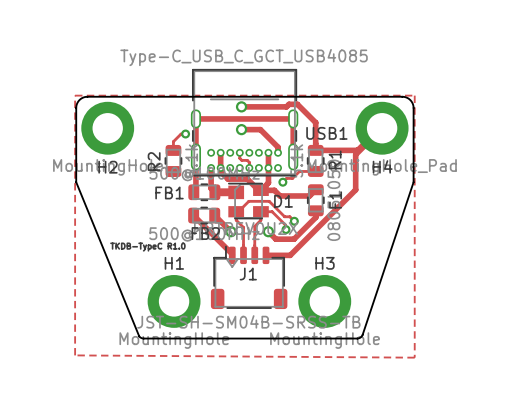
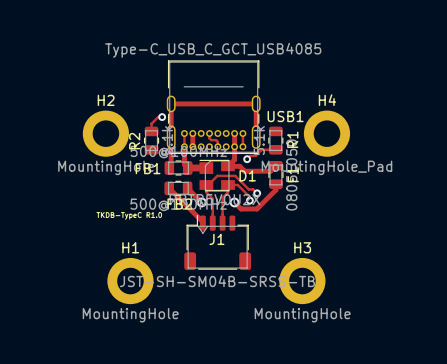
zone outline: (75, 95) (414, 95) (414, 357) (75, 355) (75, 95) -> none
board edge: (87, 96) (402, 96) (409, 99) (413, 108) (413, 182) (361, 336) (357, 338) (140, 337) (76, 182) (76, 106) (80, 99) (87, 96) -> none
track: (241, 106) (286, 106) (289, 104) (297, 104) (315, 122) (315, 150) (357, 150) (379, 128) (382, 128) (355, 154) (355, 189) (290, 255) (266, 255) -> none
via: (241, 106) -> none
H2 position: (107, 128) -> (105, 133)
H4 position: (382, 128) -> (326, 133)
track: (241, 129) (260, 129) (278, 147) (278, 152) -> (242, 146) (242, 133)
via: (241, 129) -> none
track: none -> (184, 133) (184, 146)
H4 name position: H4 (382, 166) -> H4 (327, 100)
H2 name position: H2 (107, 167) -> H2 (106, 100)
track: (220, 169) (220, 167) (220, 171) (228, 179) (247, 179) (258, 190) (265, 190) -> none
H1 position: (174, 301) -> (130, 281)
H3 position: (324, 301) -> (302, 281)

